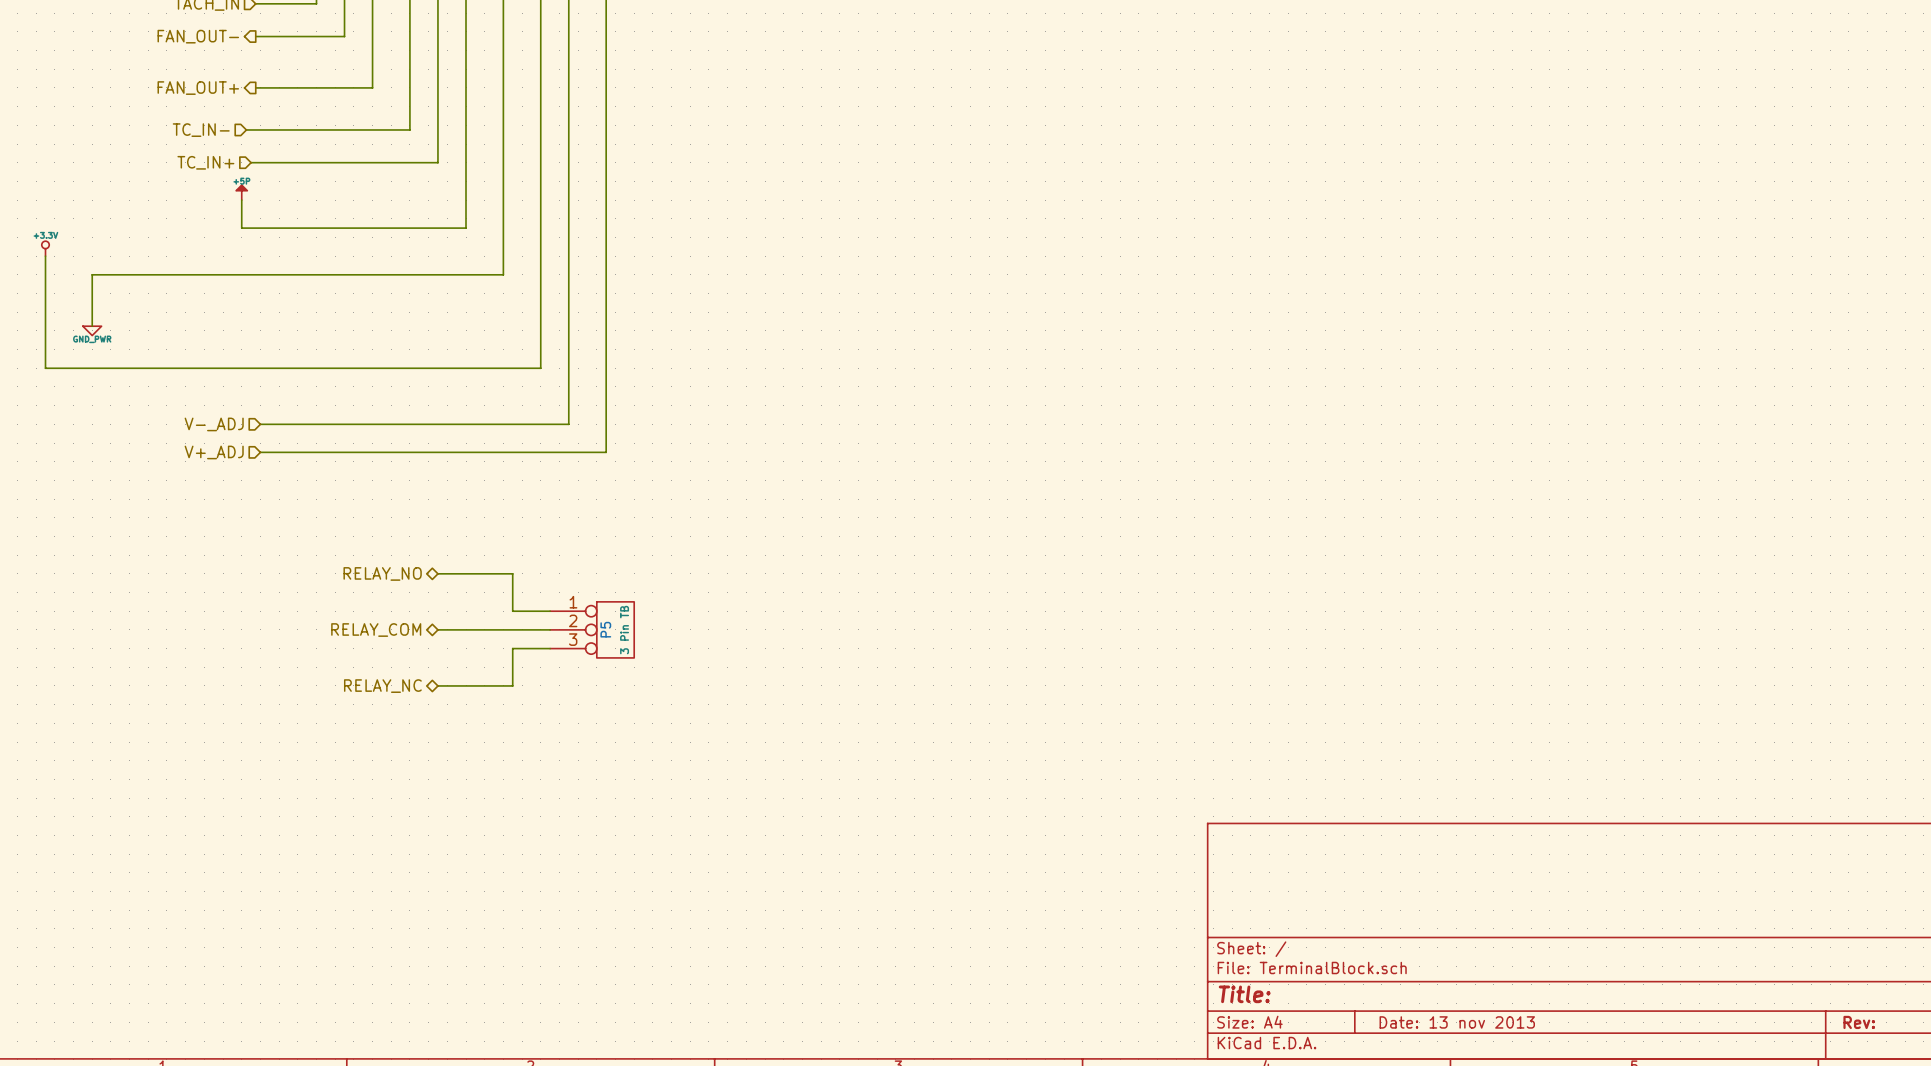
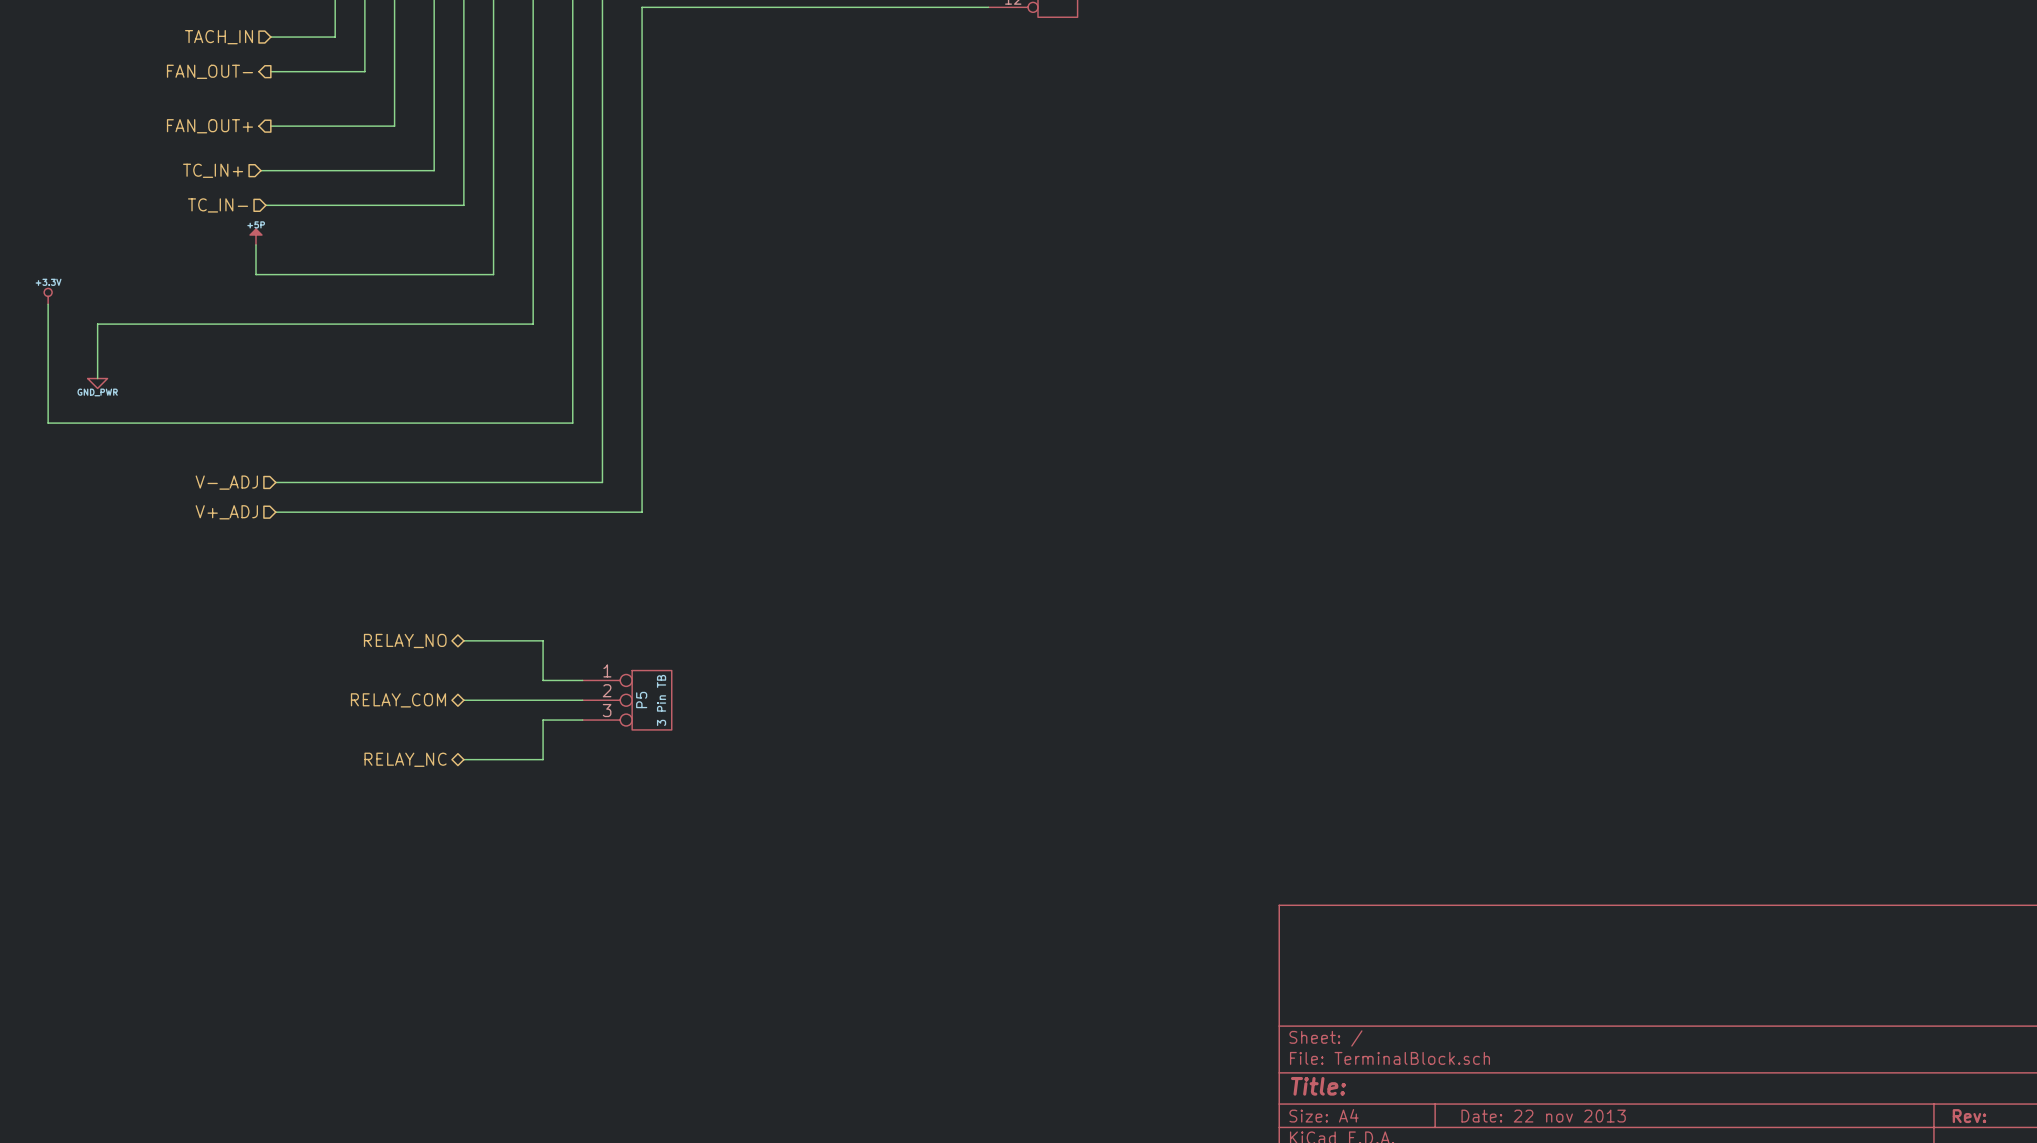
hierarchical label: TC_IN- (201, 130) -> TC_IN+ (213, 170)
hierarchical label: TC_IN+ (205, 162) -> TC_IN- (218, 205)
title block: Date: 13 nov 2013 (1457, 1022) -> Date: 22 nov 2013 (1543, 1116)

